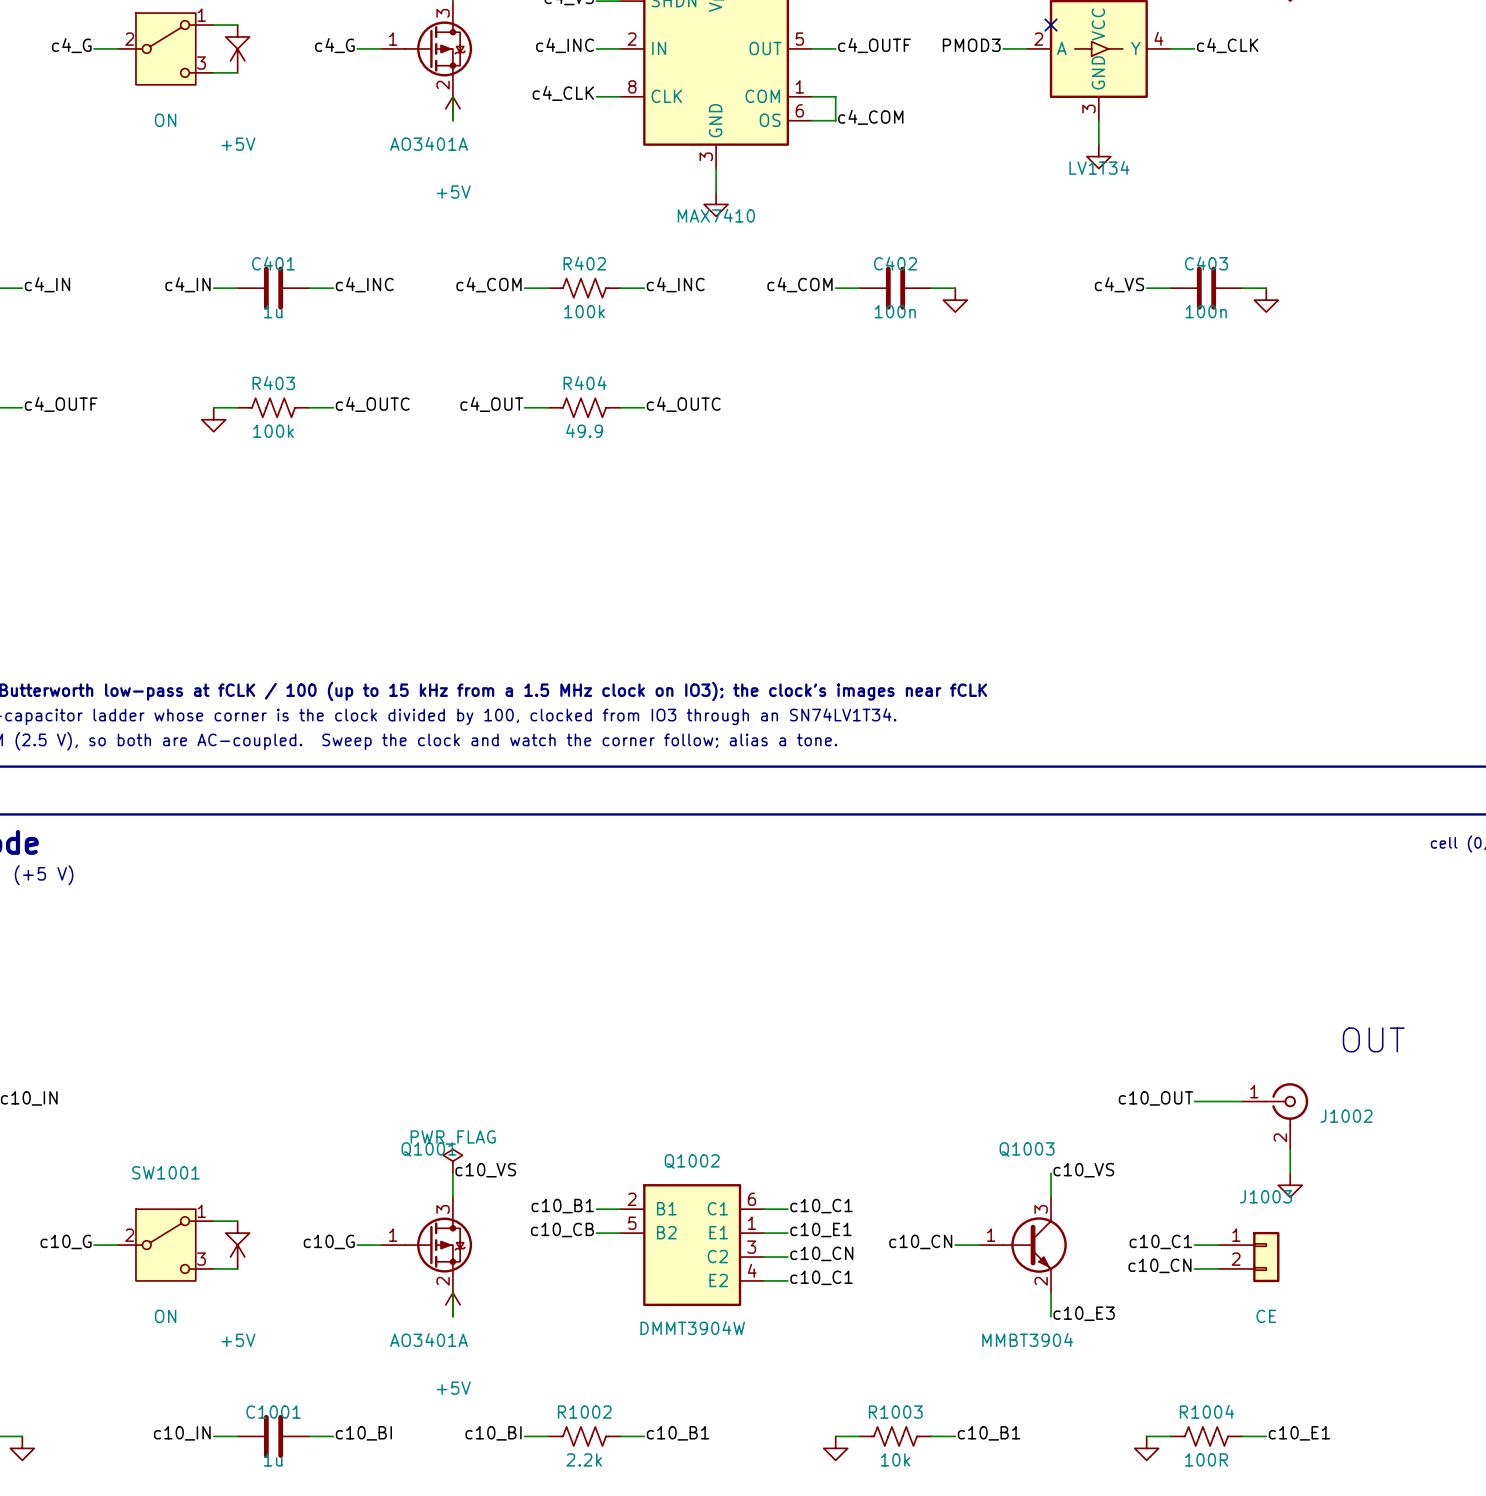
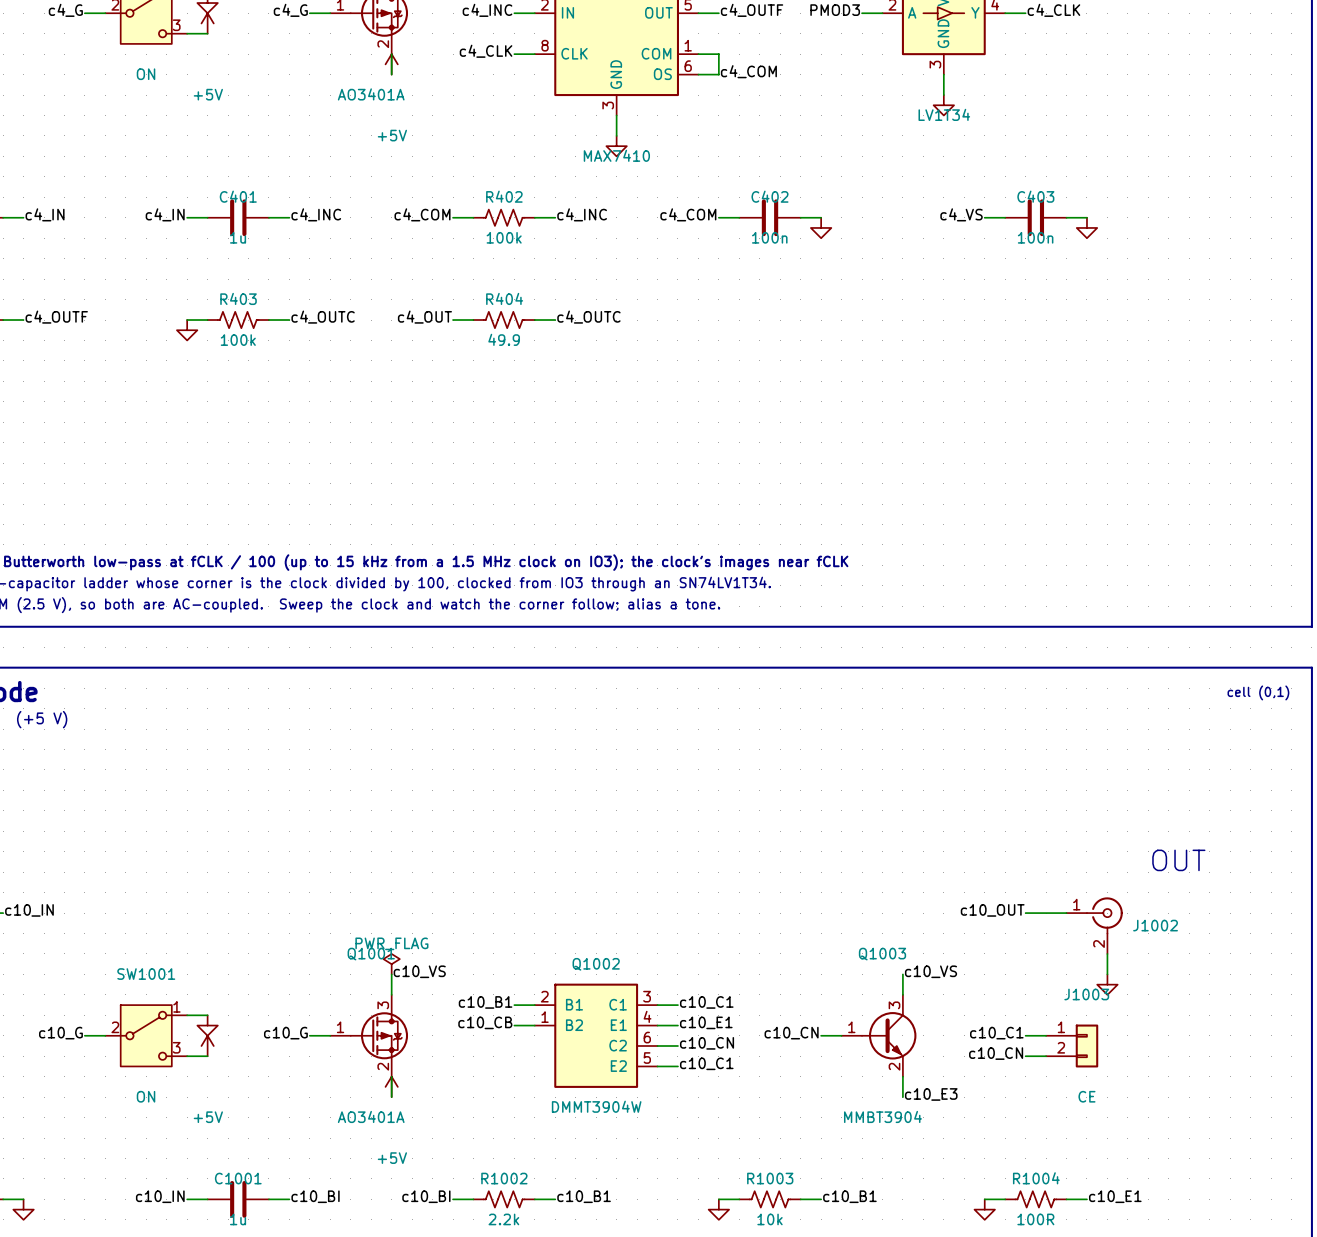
Q1002 pin number: 6 (751, 1199) -> 3 (647, 996)
Q1002 pin number: 5 (632, 1223) -> 1 (545, 1017)
Q1002 pin number: 1 (751, 1223) -> 4 (647, 1016)
Q1002 pin number: 3 (751, 1247) -> 6 (647, 1037)
Q1002 pin number: 4 (752, 1270) -> 5 (647, 1058)

